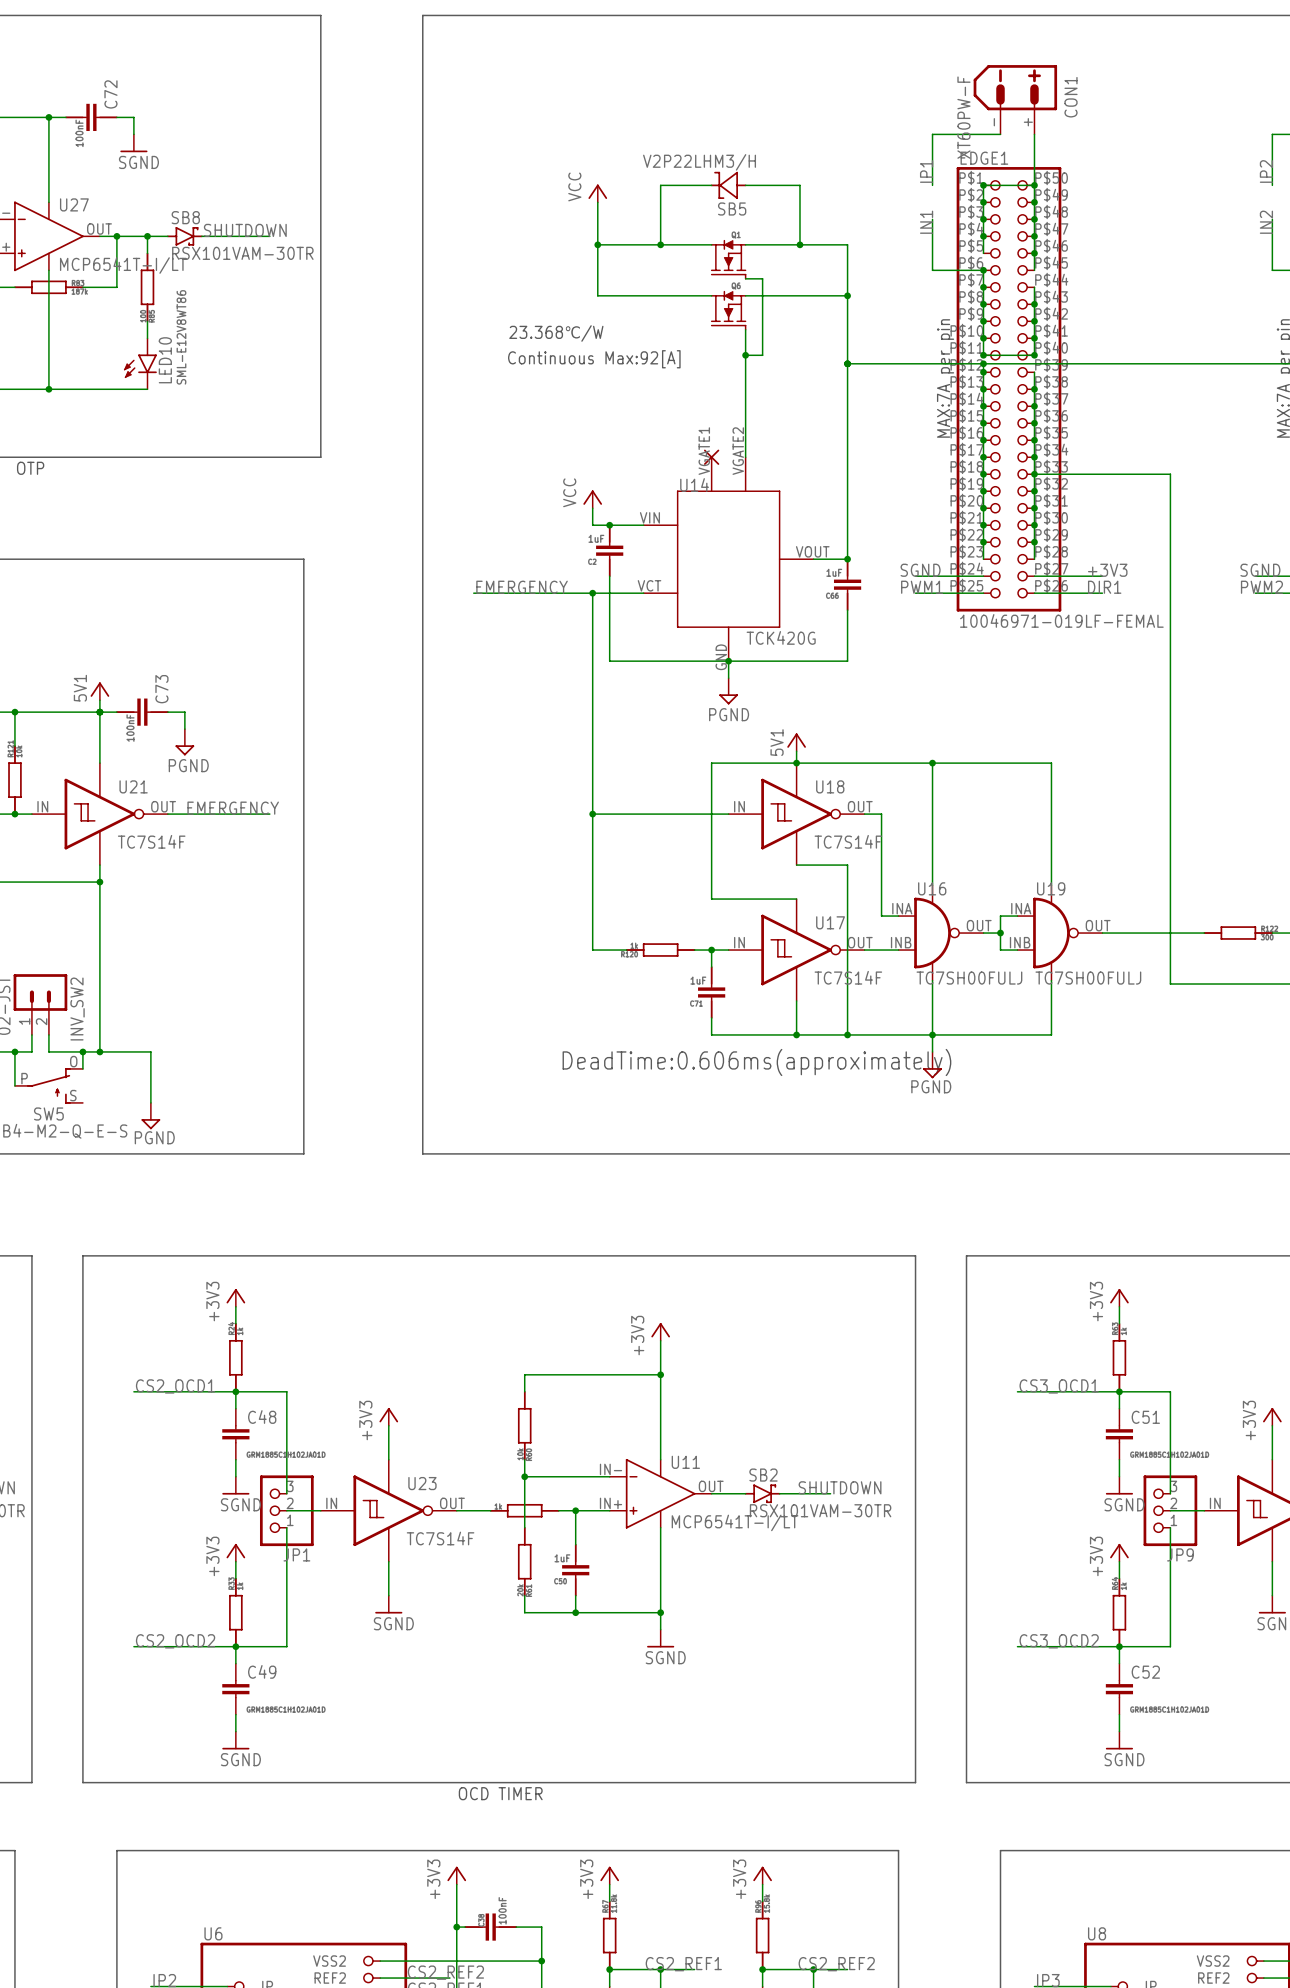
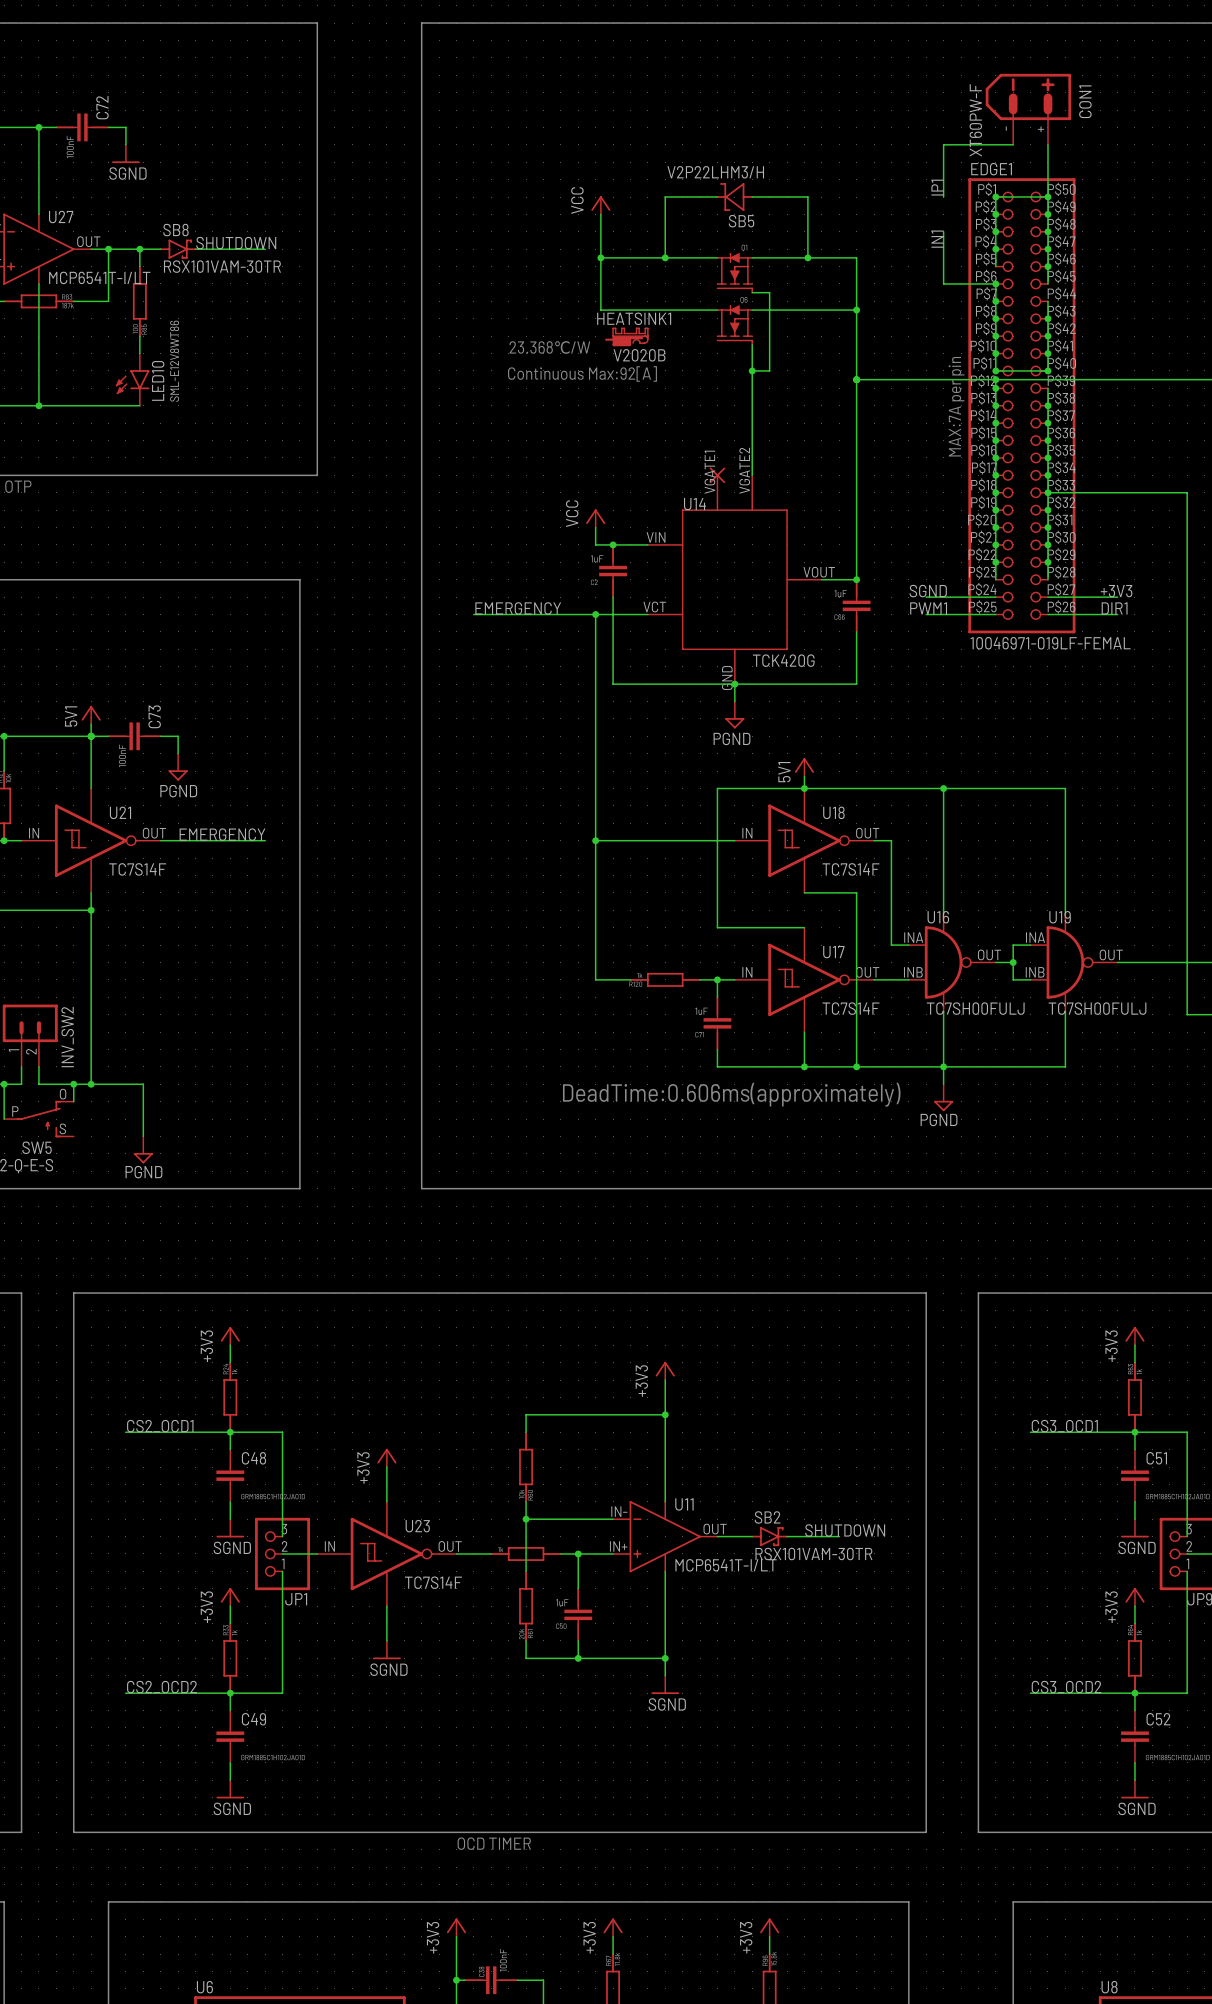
HEATSINK1: none -> V2020B (626, 337)

